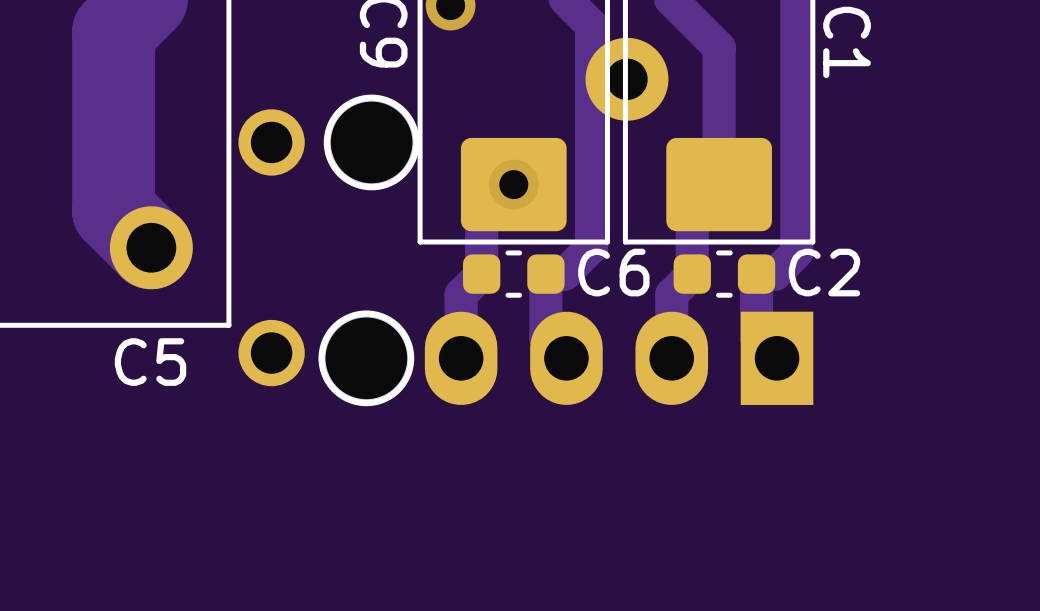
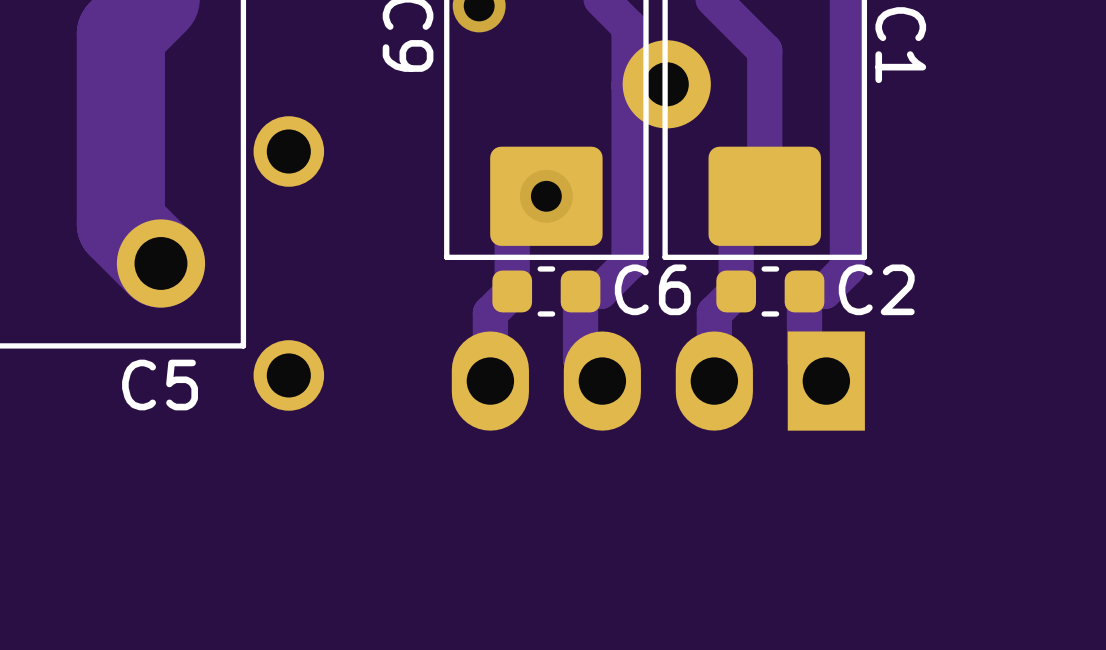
drawing: [323, 94, 420, 191] -> none
part: (371, 142) -> none
drawing: [318, 310, 415, 407] -> none
part: (366, 358) -> none

